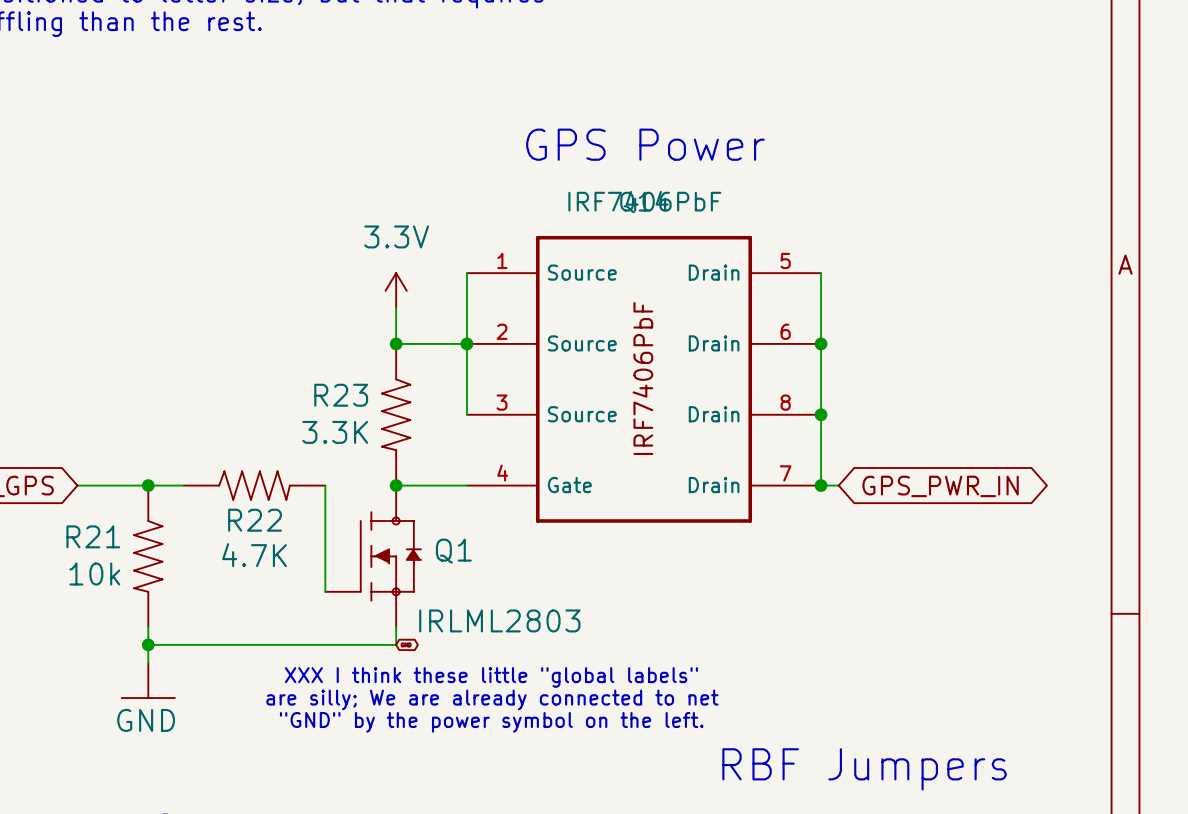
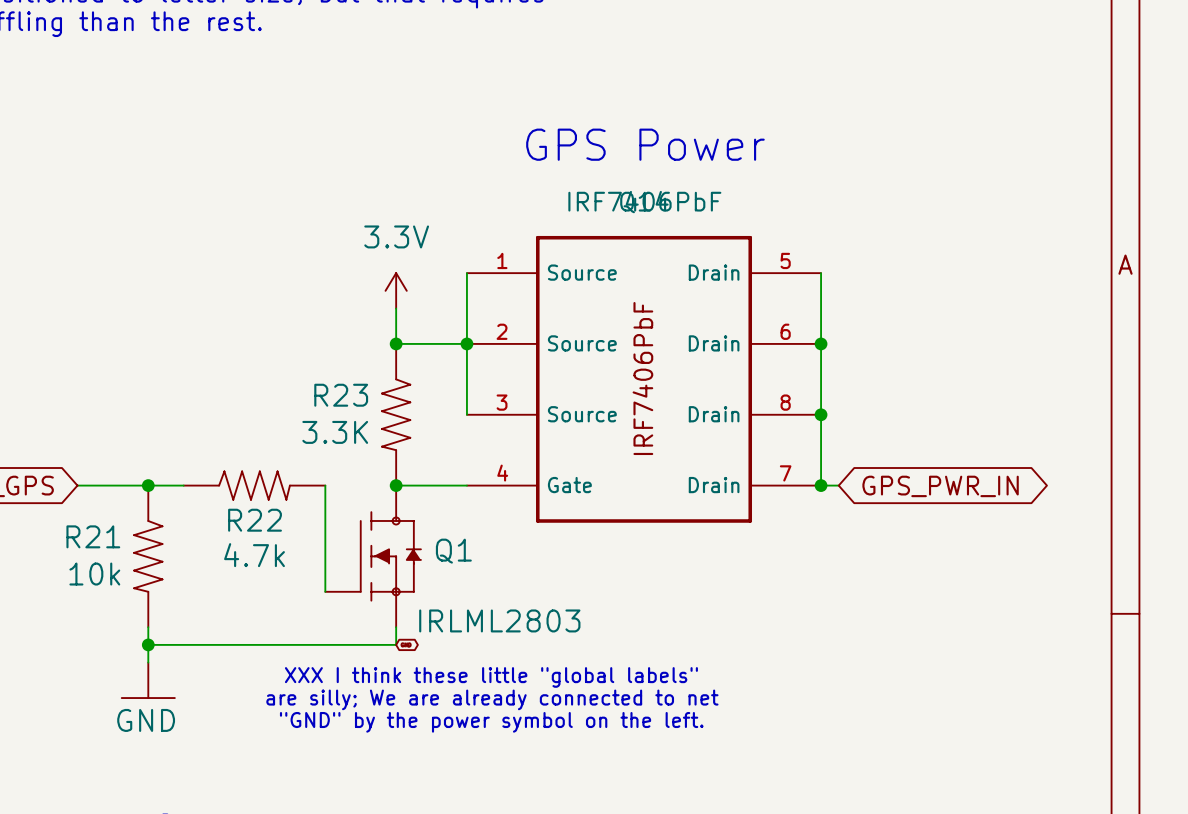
R22 value: 4.7K (254, 555) -> 4.7k (254, 555)
text: RBF Jumpers (864, 769) -> none

